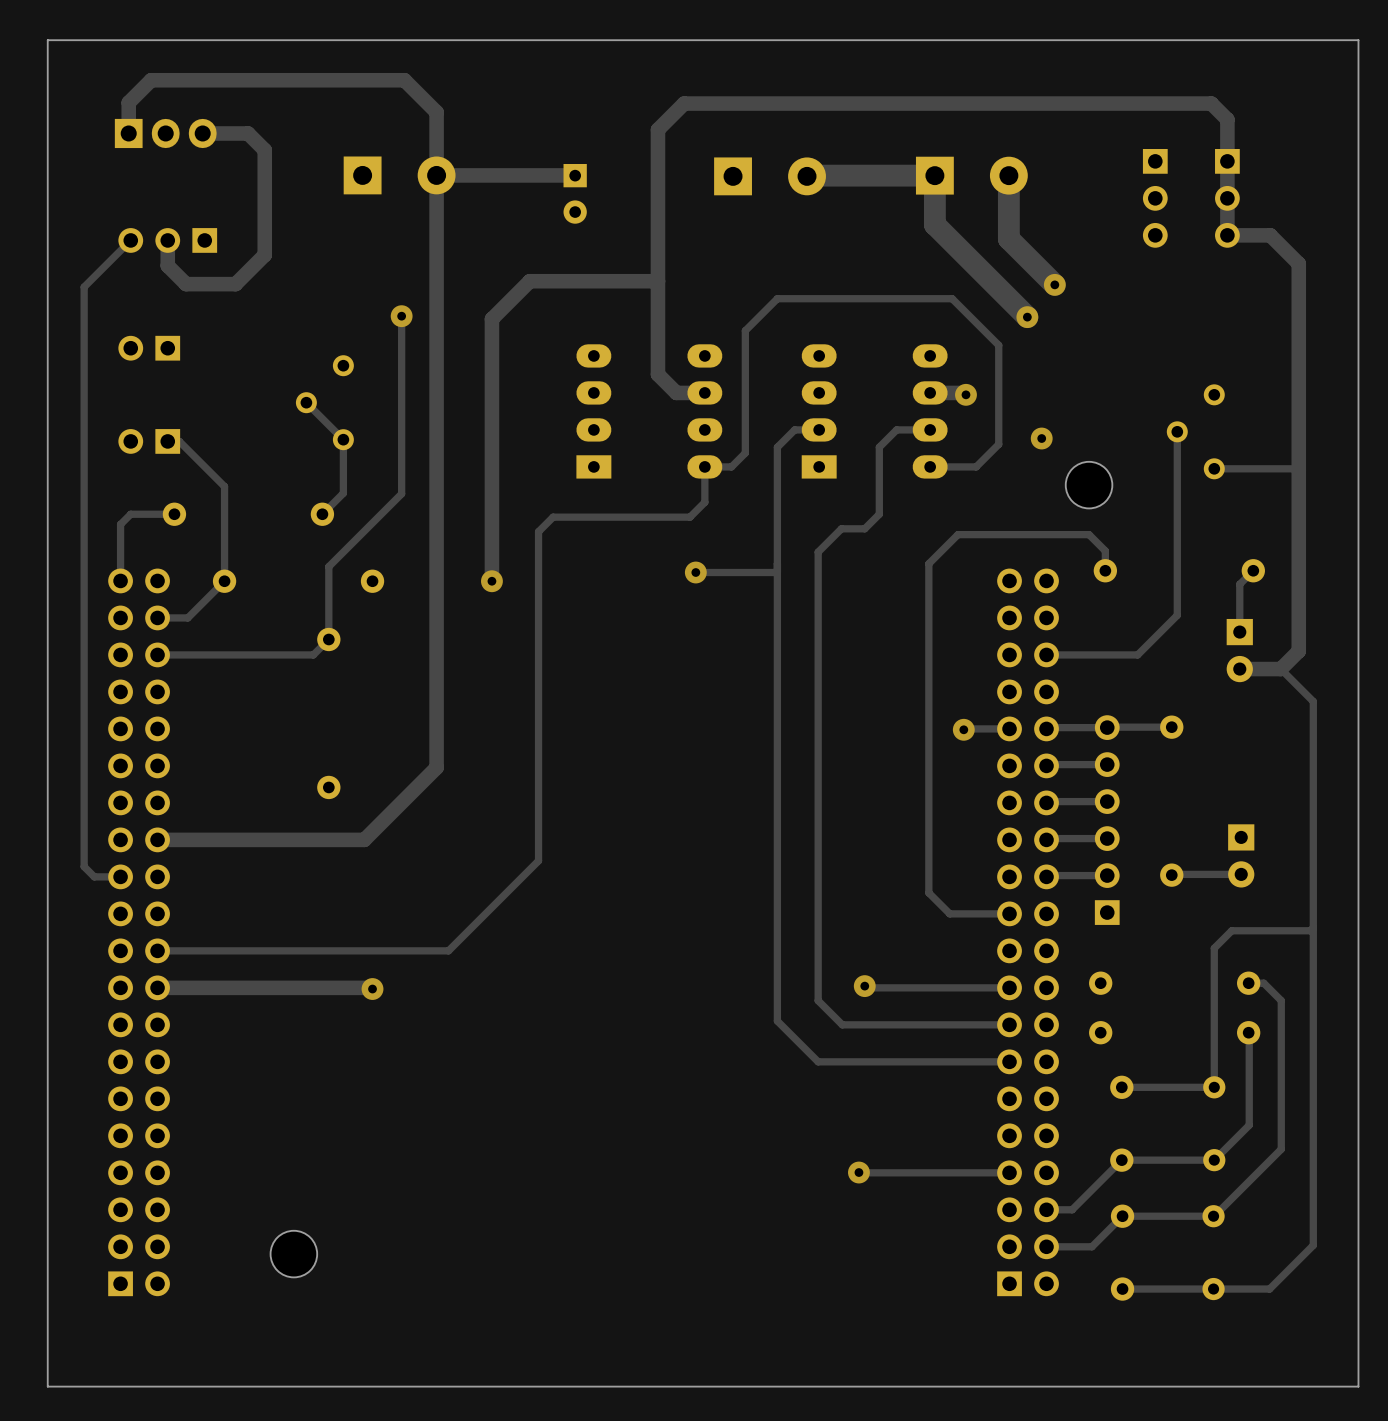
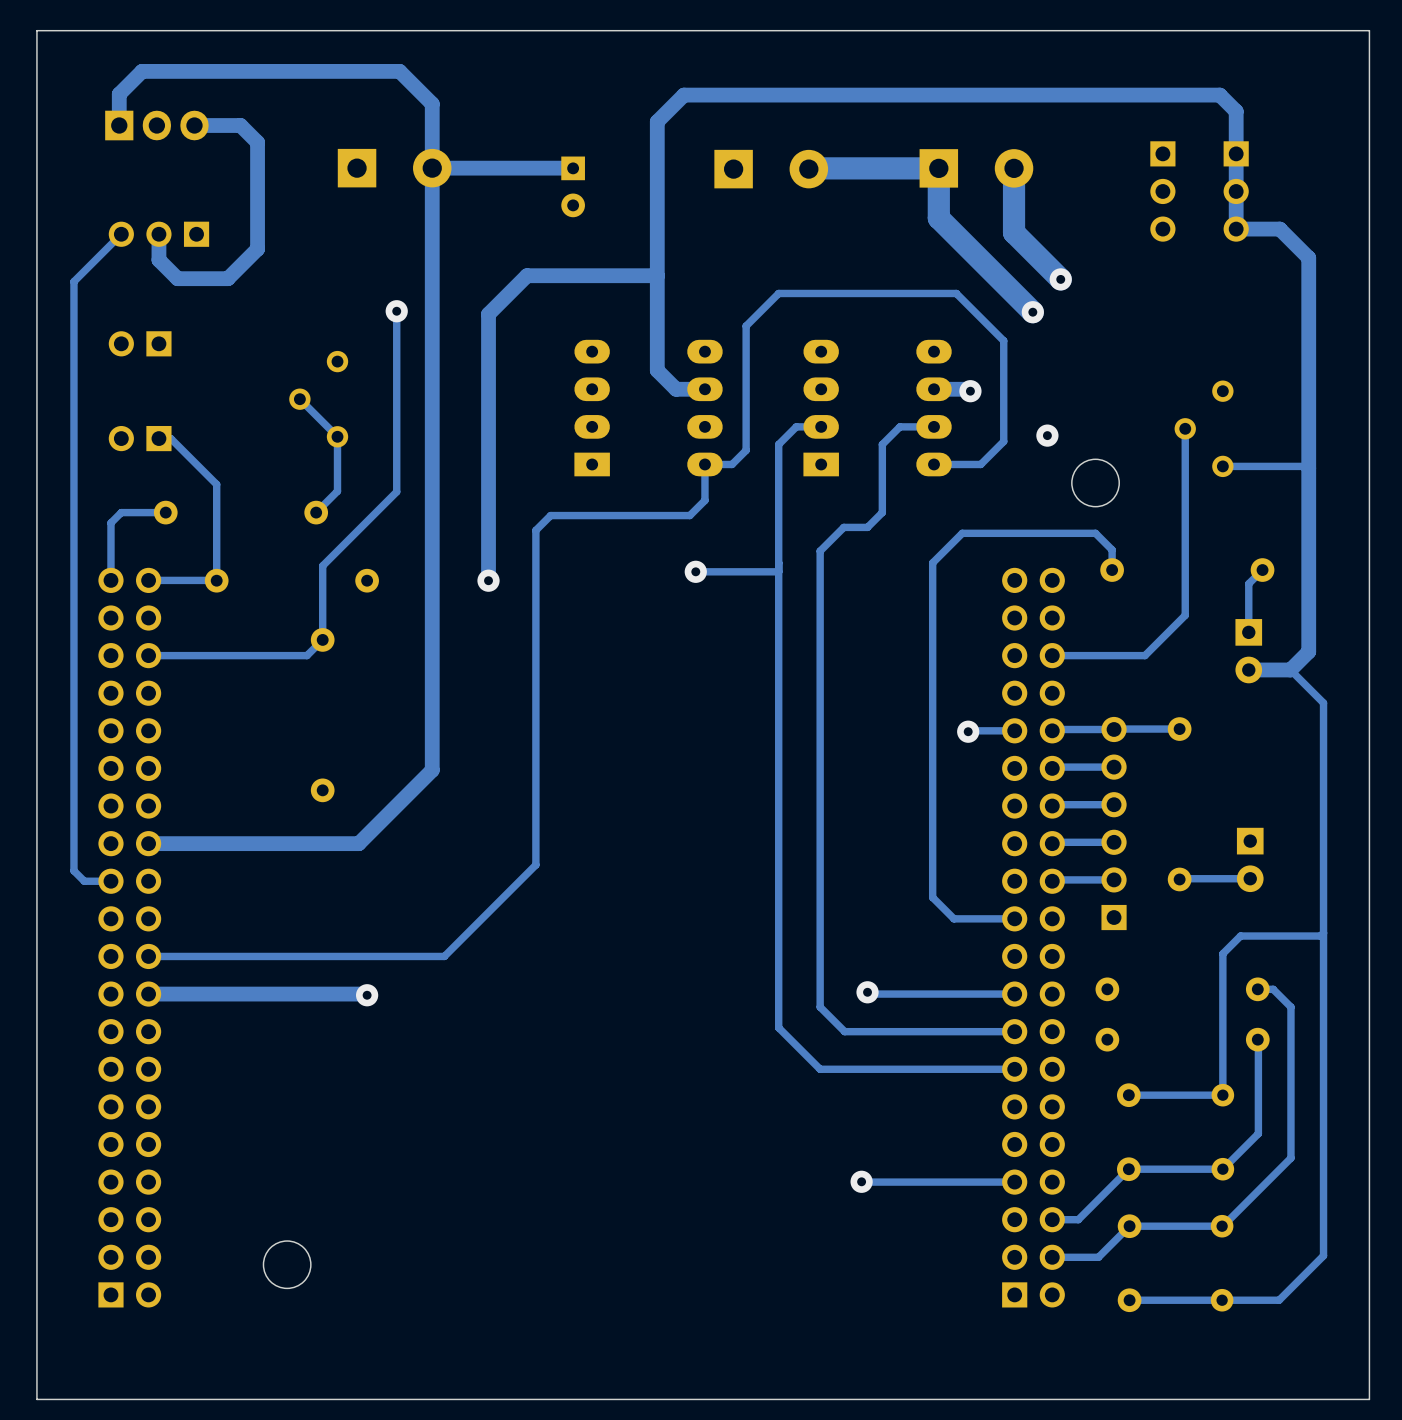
track: (224, 581) (187, 617) (157, 617) -> (216, 580) (148, 580)

